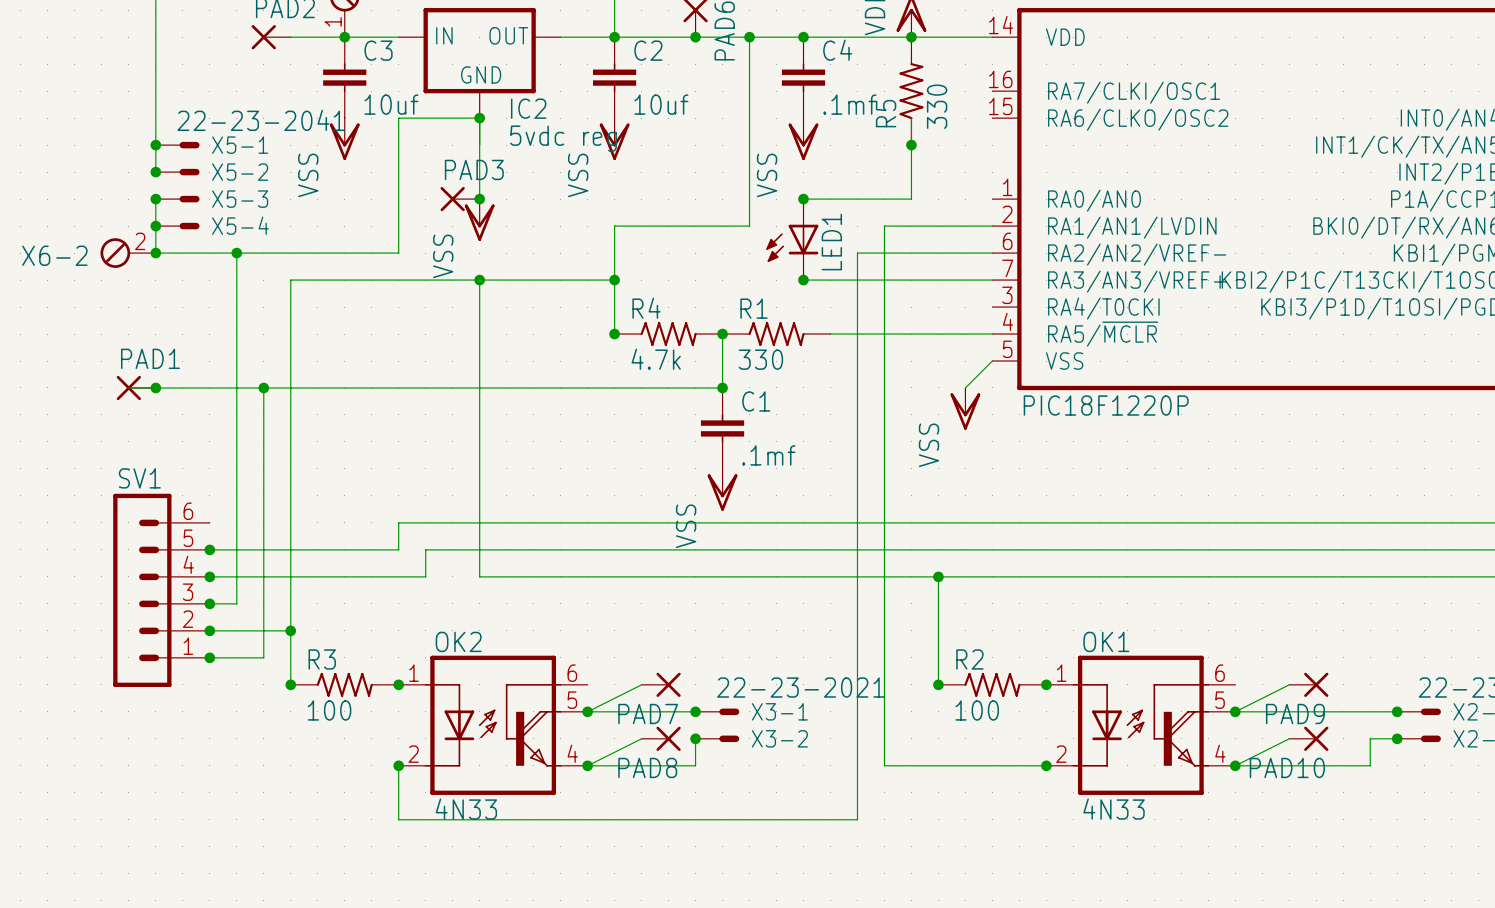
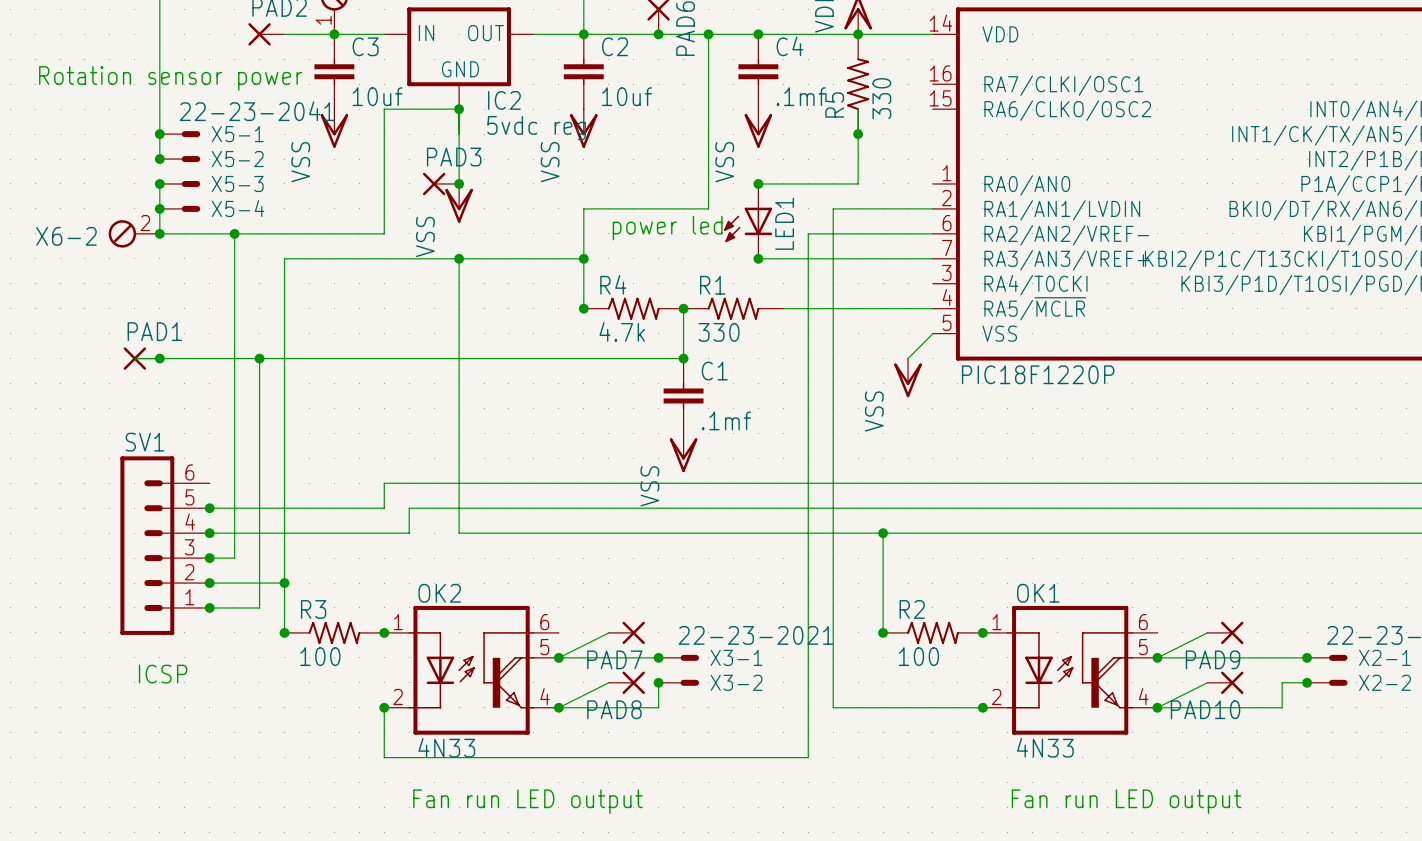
text: none -> Rotation sensor power (170, 78)
text: none -> power led (667, 228)
text: none -> ICSP (163, 674)
text: none -> Fan run LED output (527, 801)
text: none -> Fan run LED output (1126, 801)

